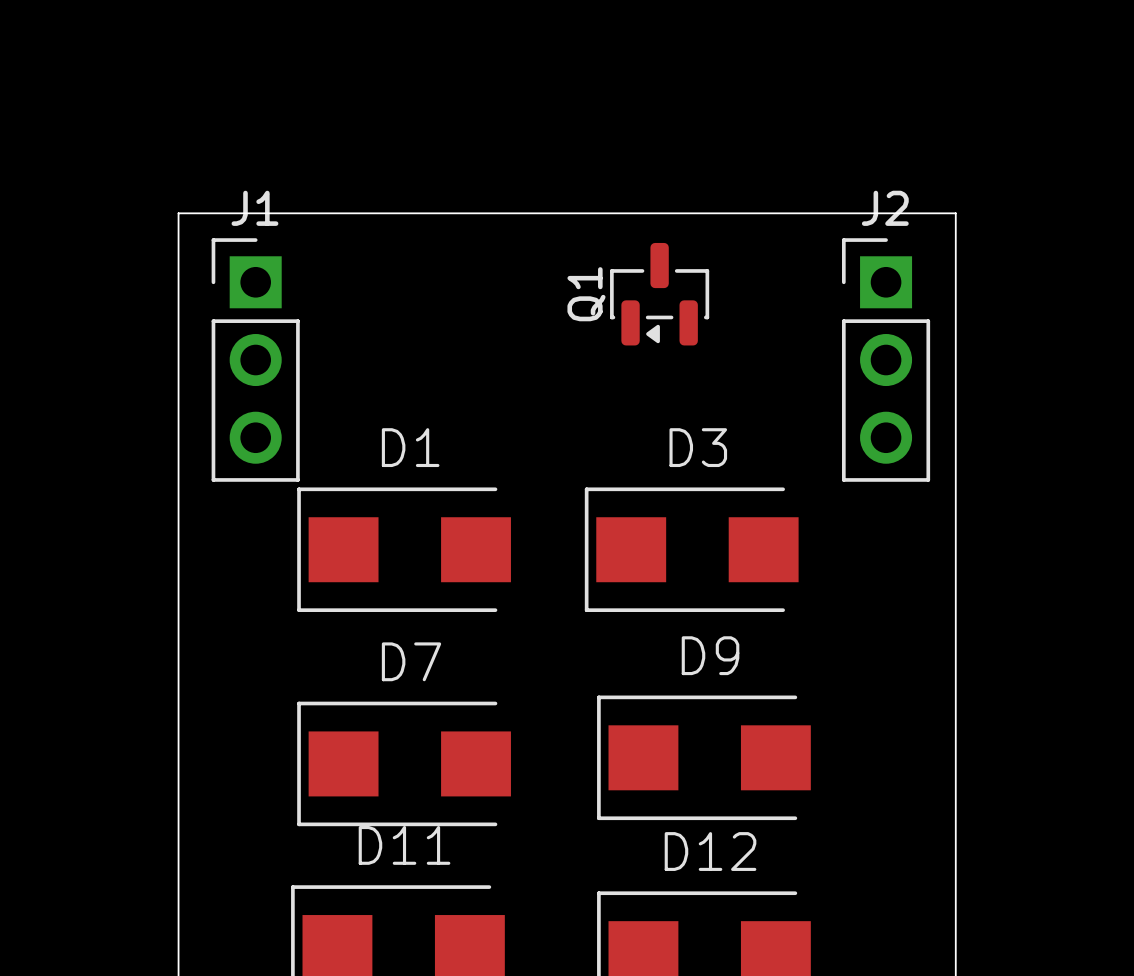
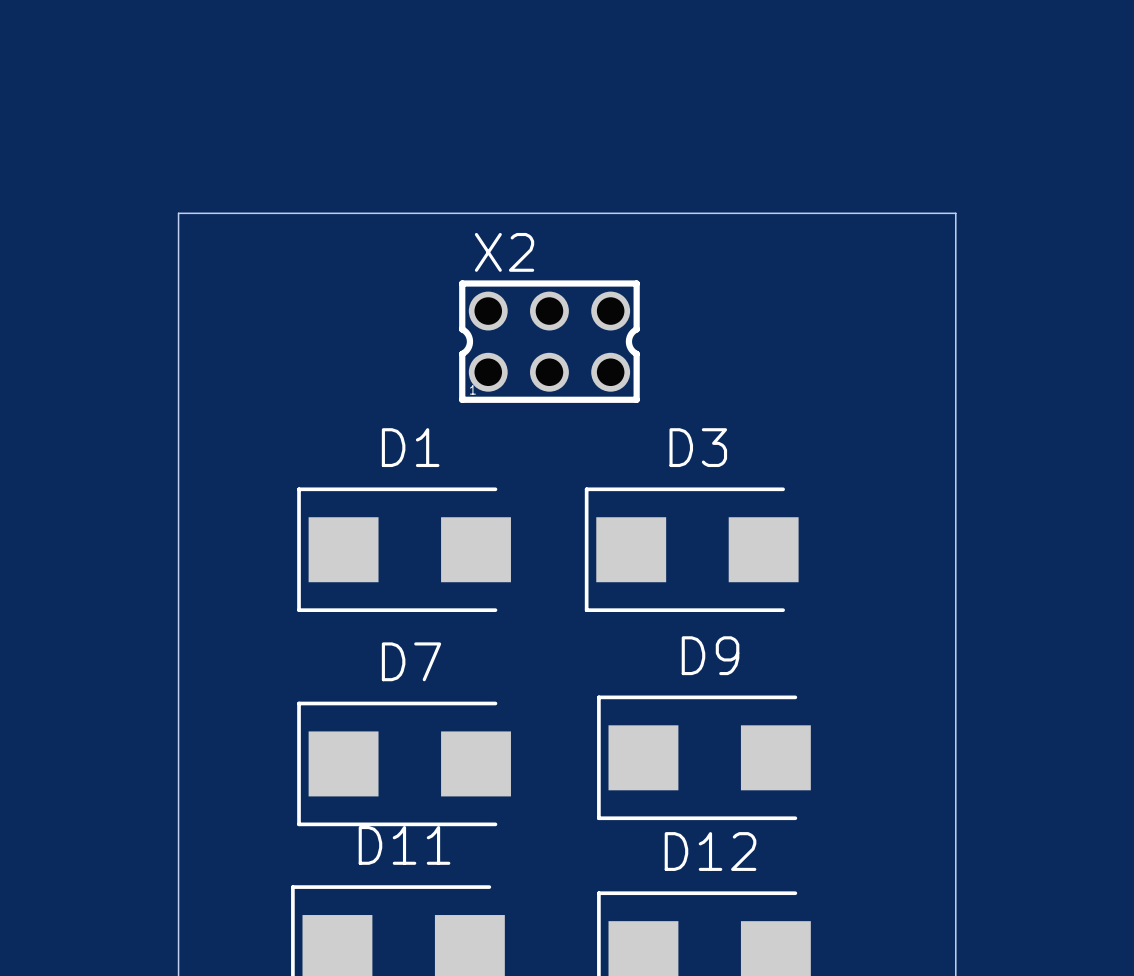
Q1: (659, 294) -> none
X2: none -> (549, 341)
J1: (255, 360) -> none
J2: (886, 360) -> none

